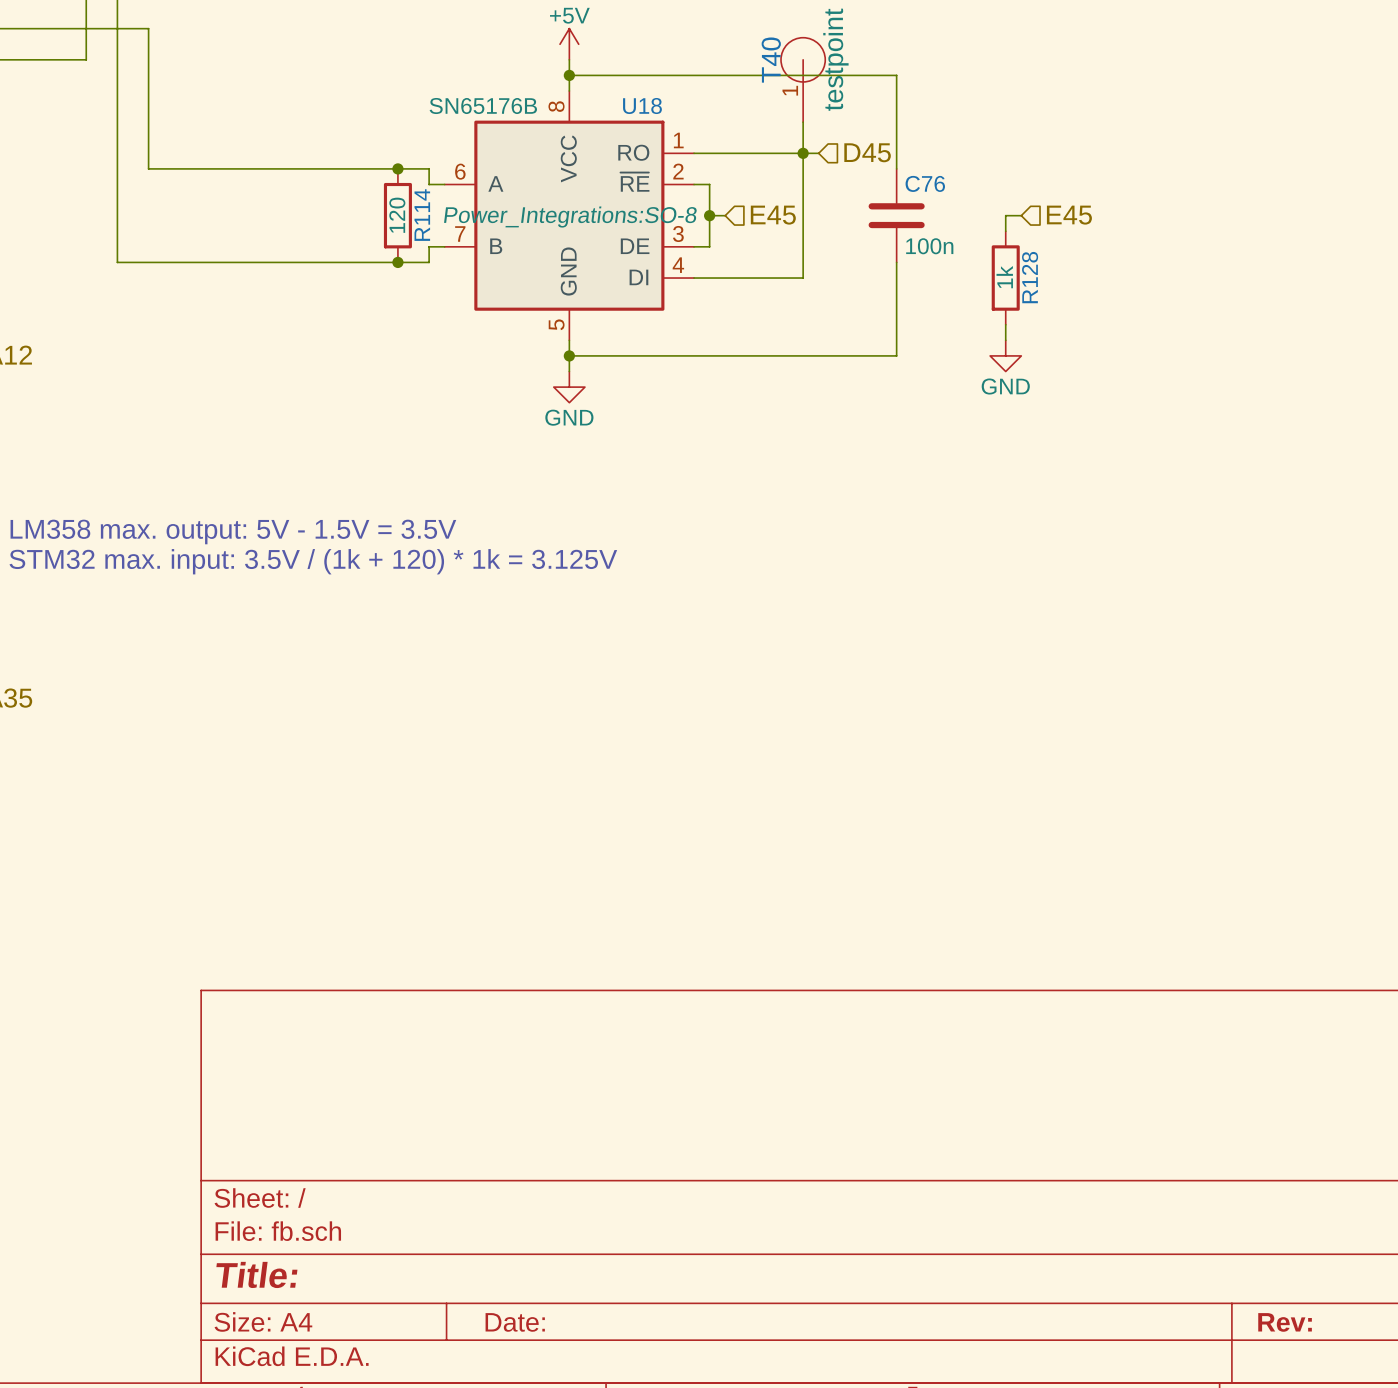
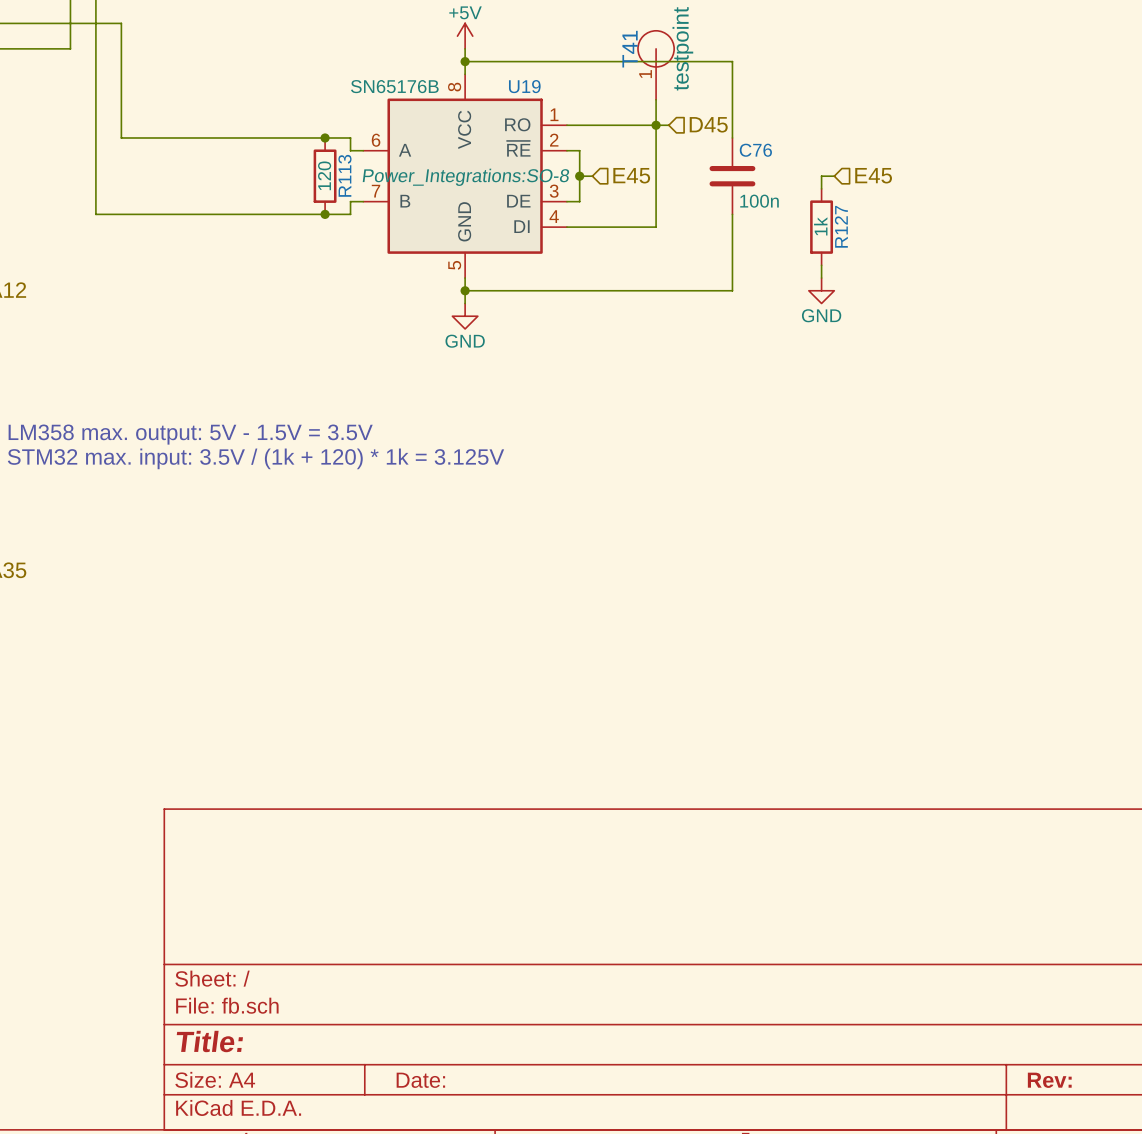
T40 name: T40 (771, 60) -> T41 (630, 49)
U18 name: U18 (642, 106) -> U19 (524, 86)
R114 name: R114 (422, 215) -> R113 (344, 175)
R128 name: R128 (1030, 277) -> R127 (841, 226)

